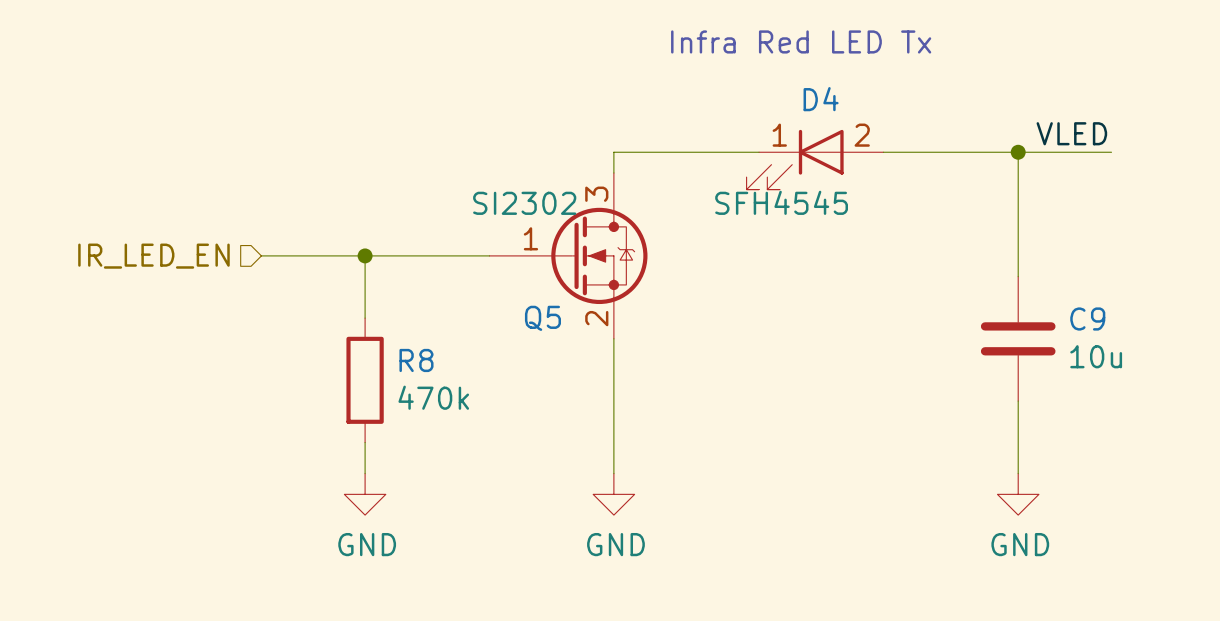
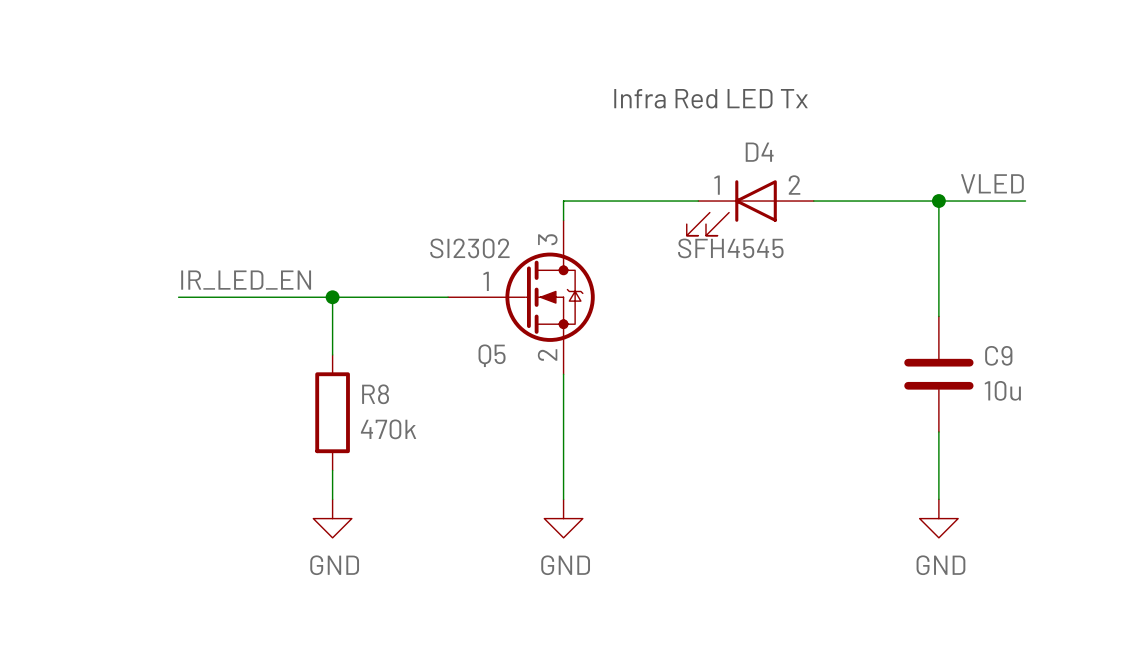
label: none -> IR_LED_EN (246, 280)
wire: none -> (178, 297) (236, 297)
hierarchical label: IR_LED_EN (153, 256) -> none

